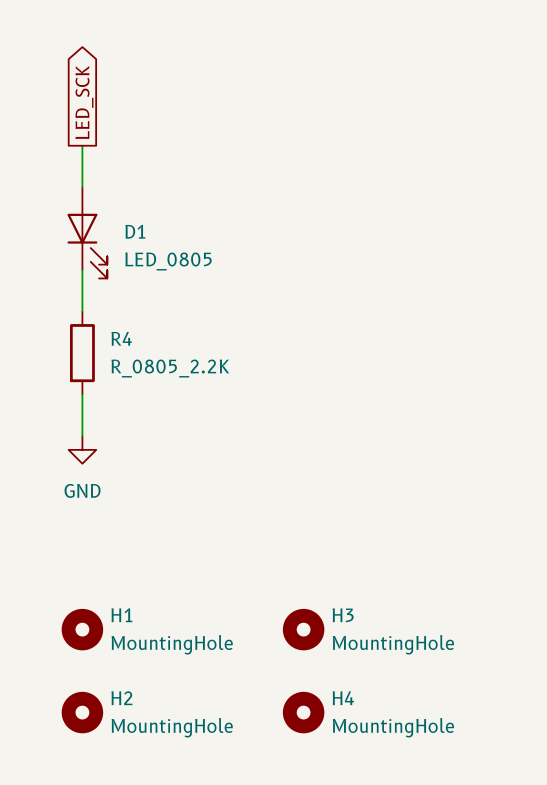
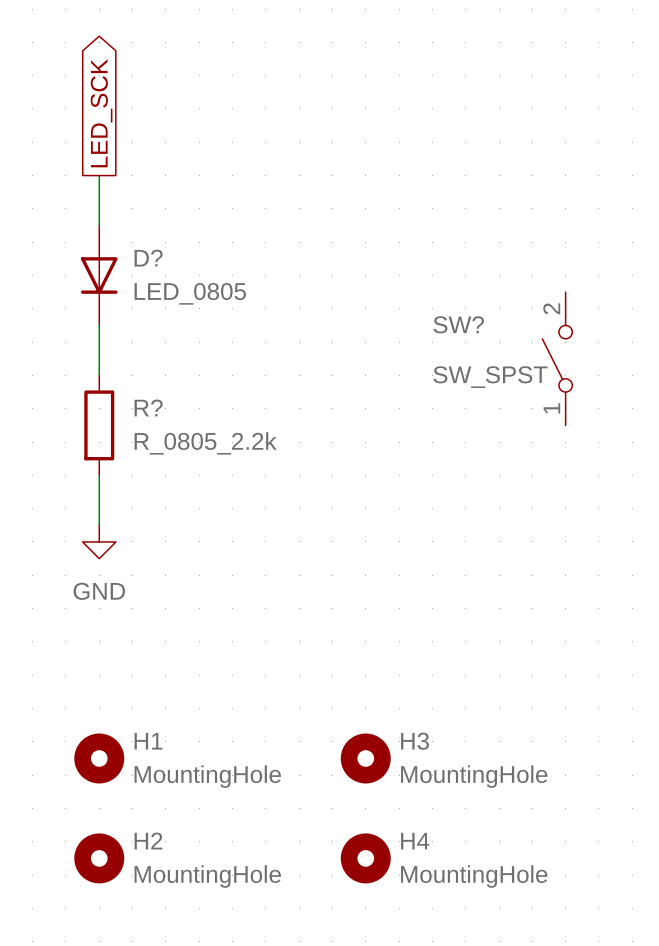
D?: none -> LED_0805 (99, 275)
D1: LED_0805 (87, 232) -> none
SW?: none -> SW_SPST (557, 358)
R4 name: R4 (121, 338) -> R? (148, 407)
R4 value: R_0805_2.2K (170, 368) -> R_0805_2.2k (205, 443)

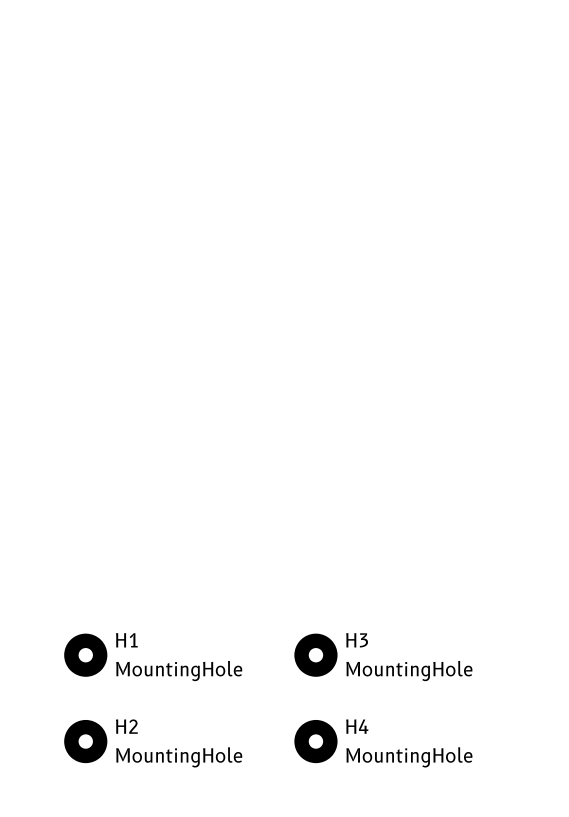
global label: LED_SCK (101, 113) -> none
wire: (99, 175) (99, 225) -> none
D?: LED_0805 (99, 275) -> none
wire: (99, 325) (99, 375) -> none
SW?: SW_SPST (557, 358) -> none
R?: R_0805_2.2k (99, 425) -> none
wire: (99, 475) (99, 525) -> none
power symbol: GND (99, 541) -> none

